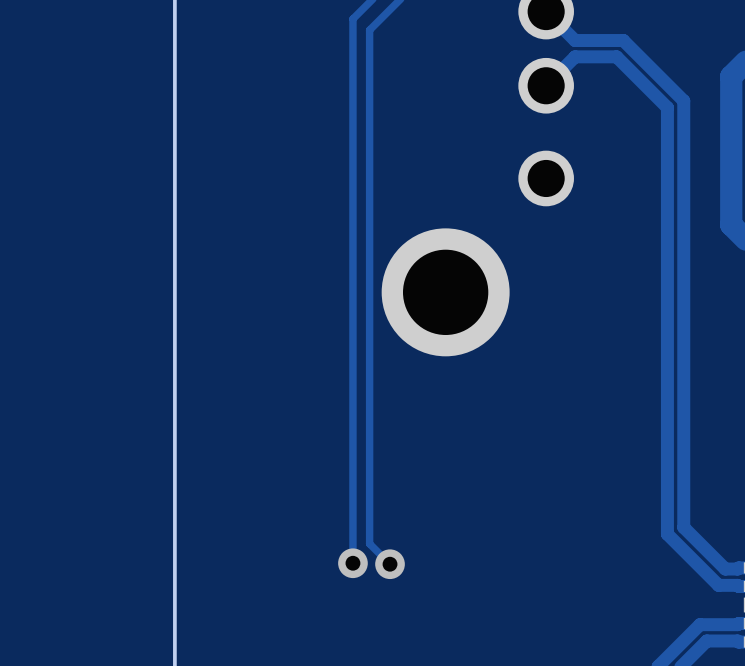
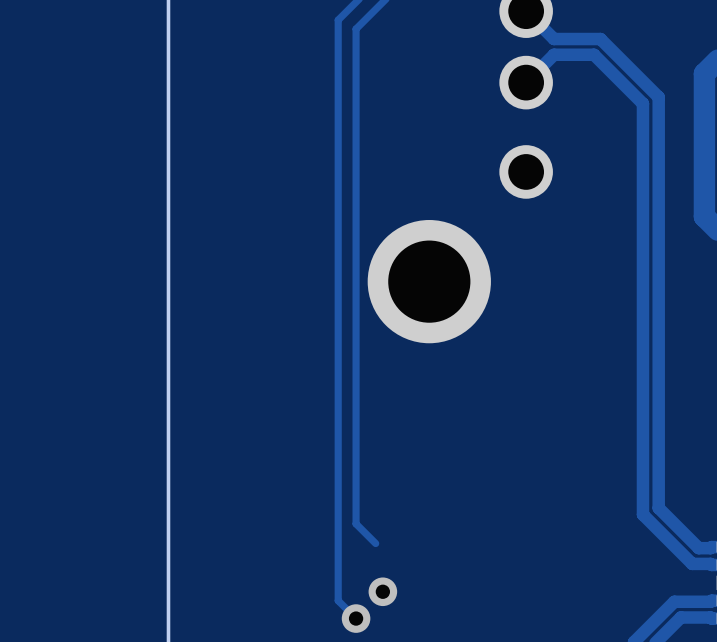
track: (352, 18) (352, 563) -> (340, 18) (338, 20) (338, 600) (356, 618)
via: (352, 563) -> none
via: (390, 564) -> none
via: none -> (382, 591)
via: none -> (356, 618)

